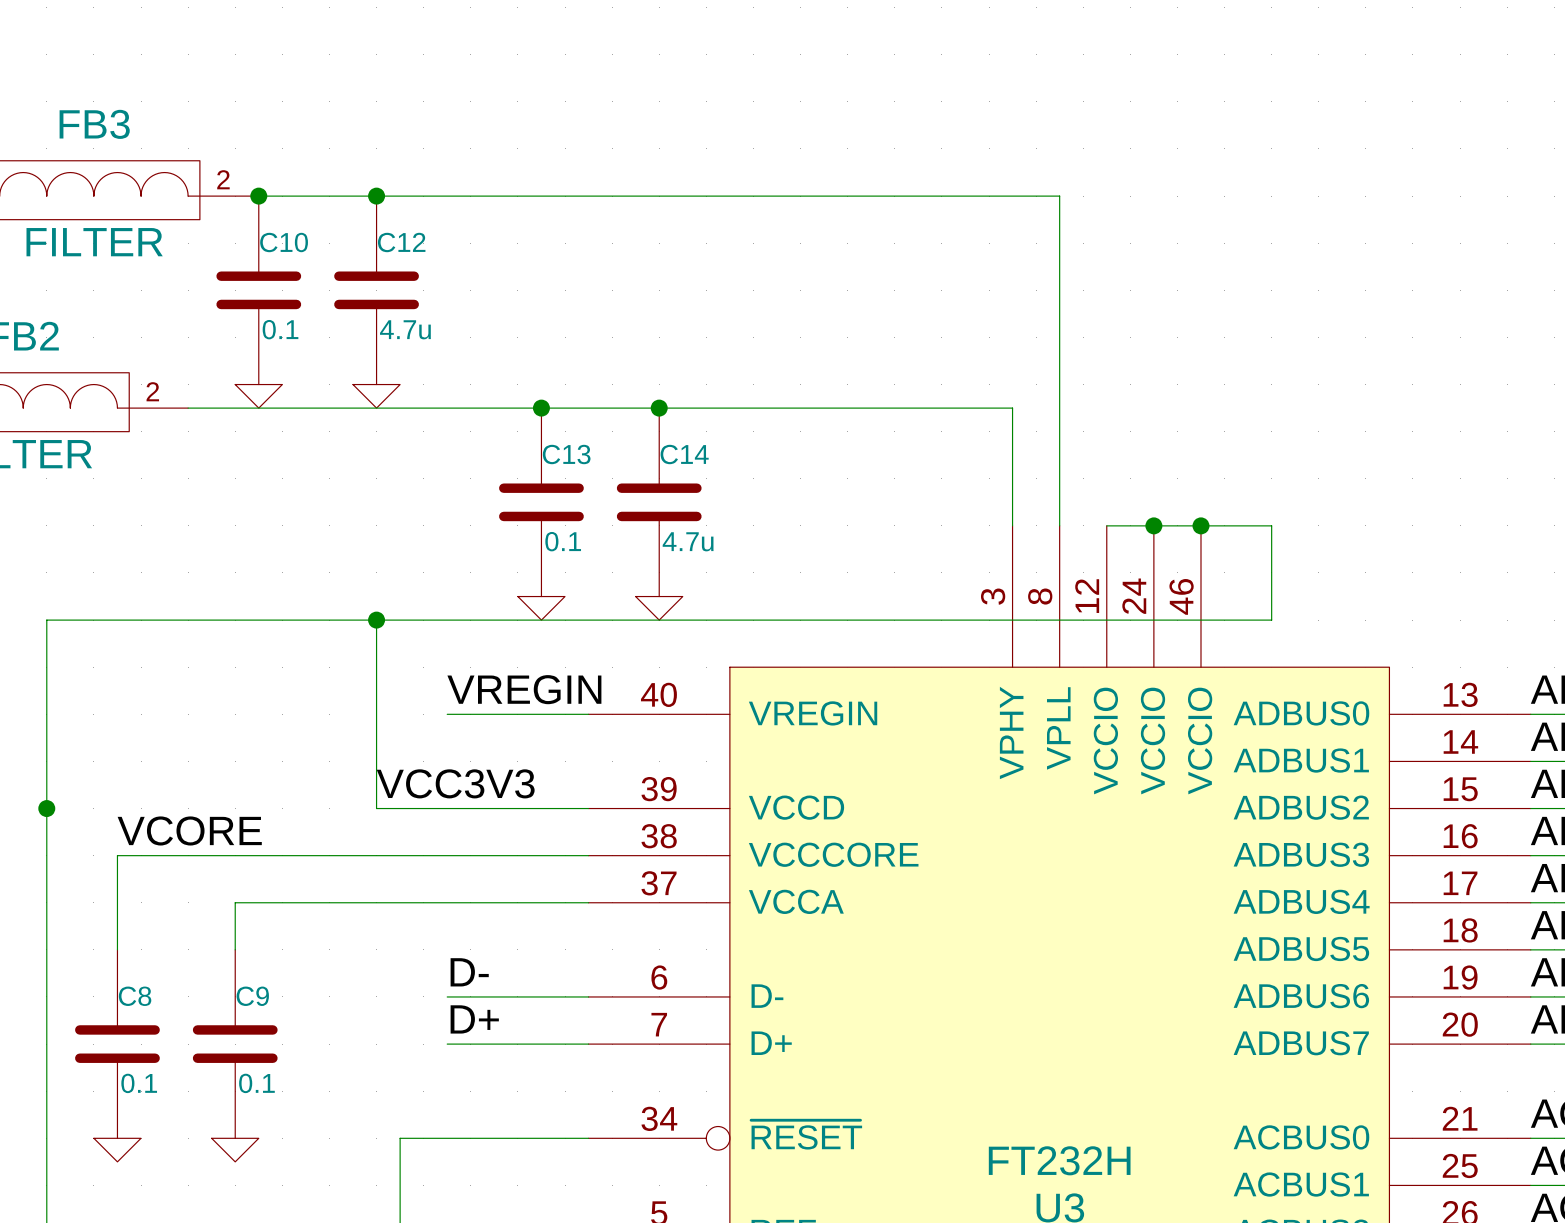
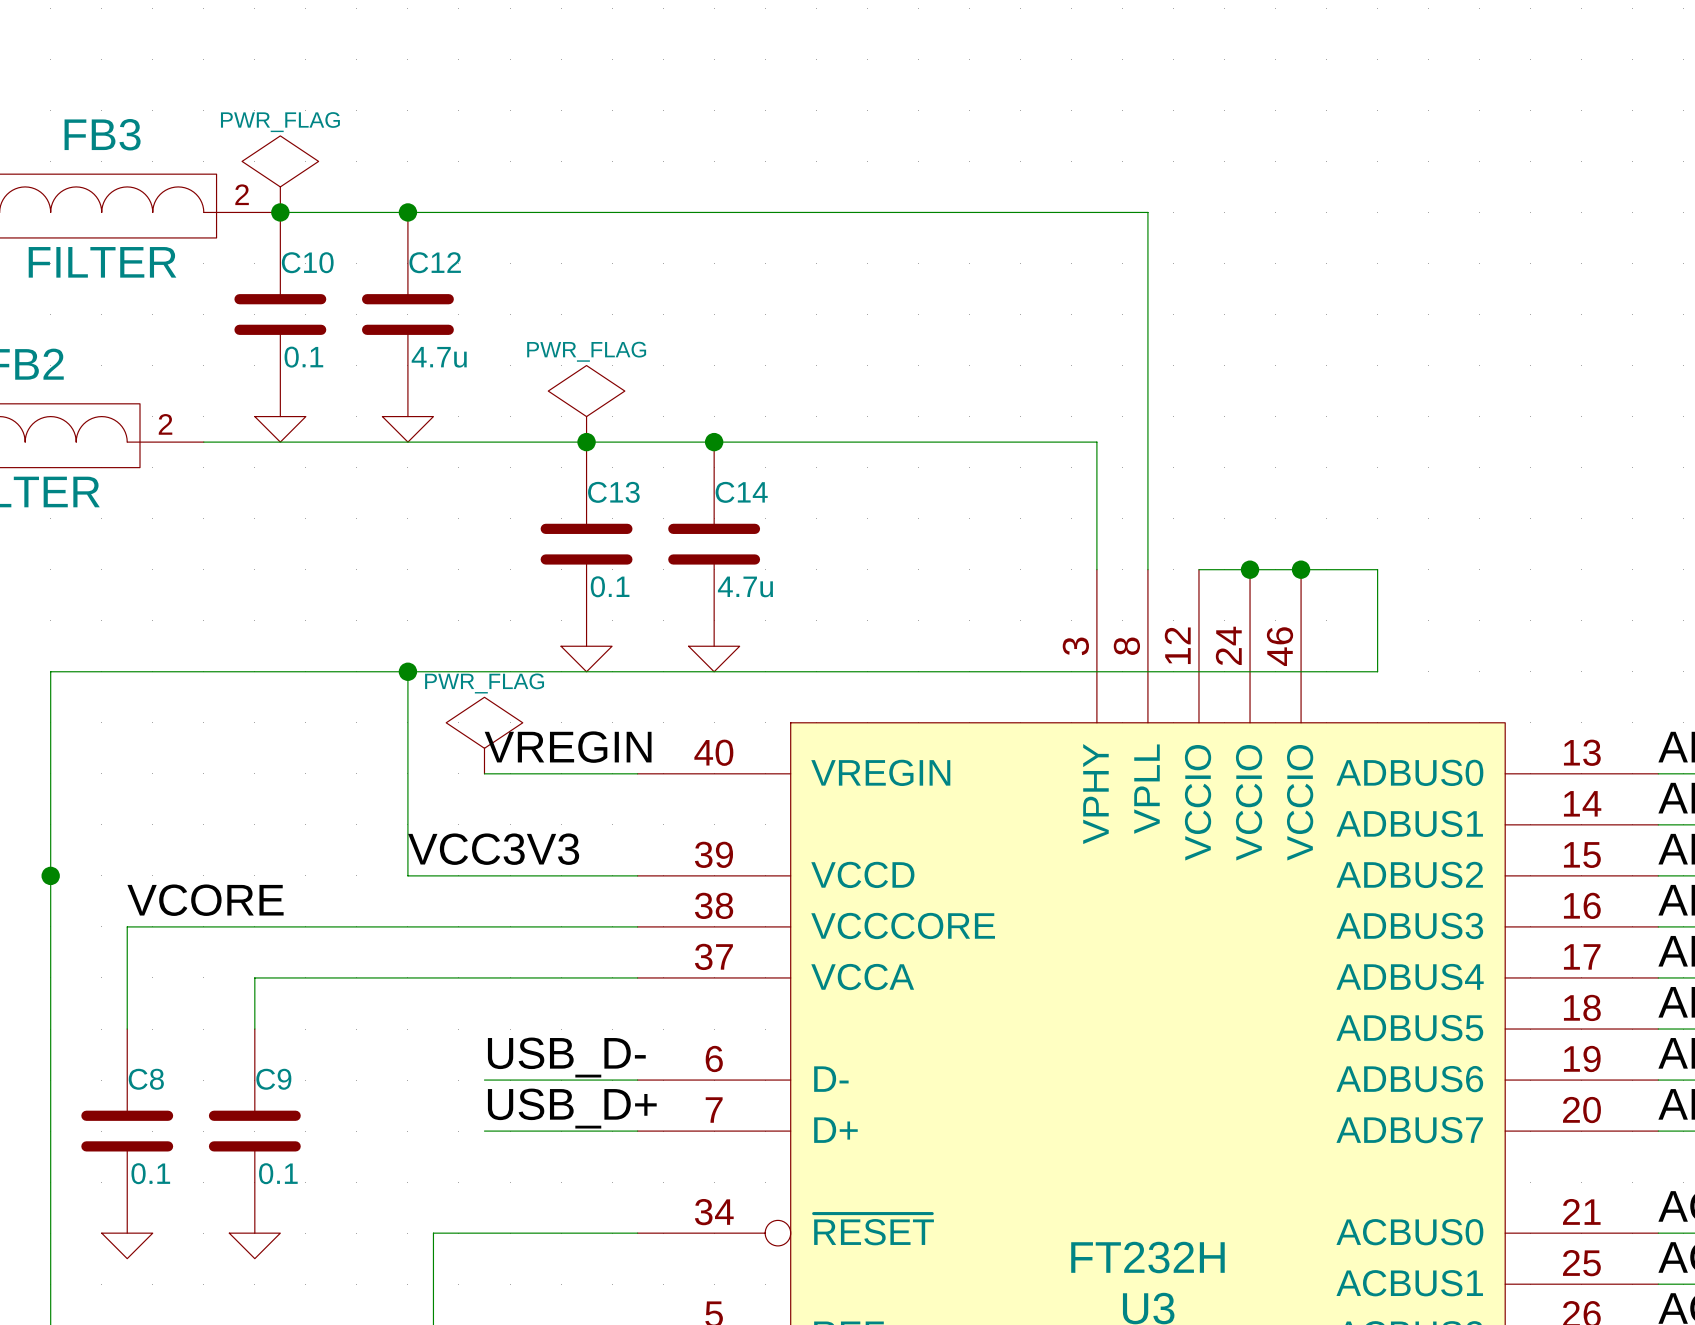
power symbol: none -> PWR_FLAG (280, 174)
power symbol: none -> PWR_FLAG (586, 403)
power symbol: none -> PWR_FLAG (484, 735)
label: D- (469, 972) -> USB_D- (566, 1057)
label: D+ (474, 1019) -> USB_D+ (572, 1108)

